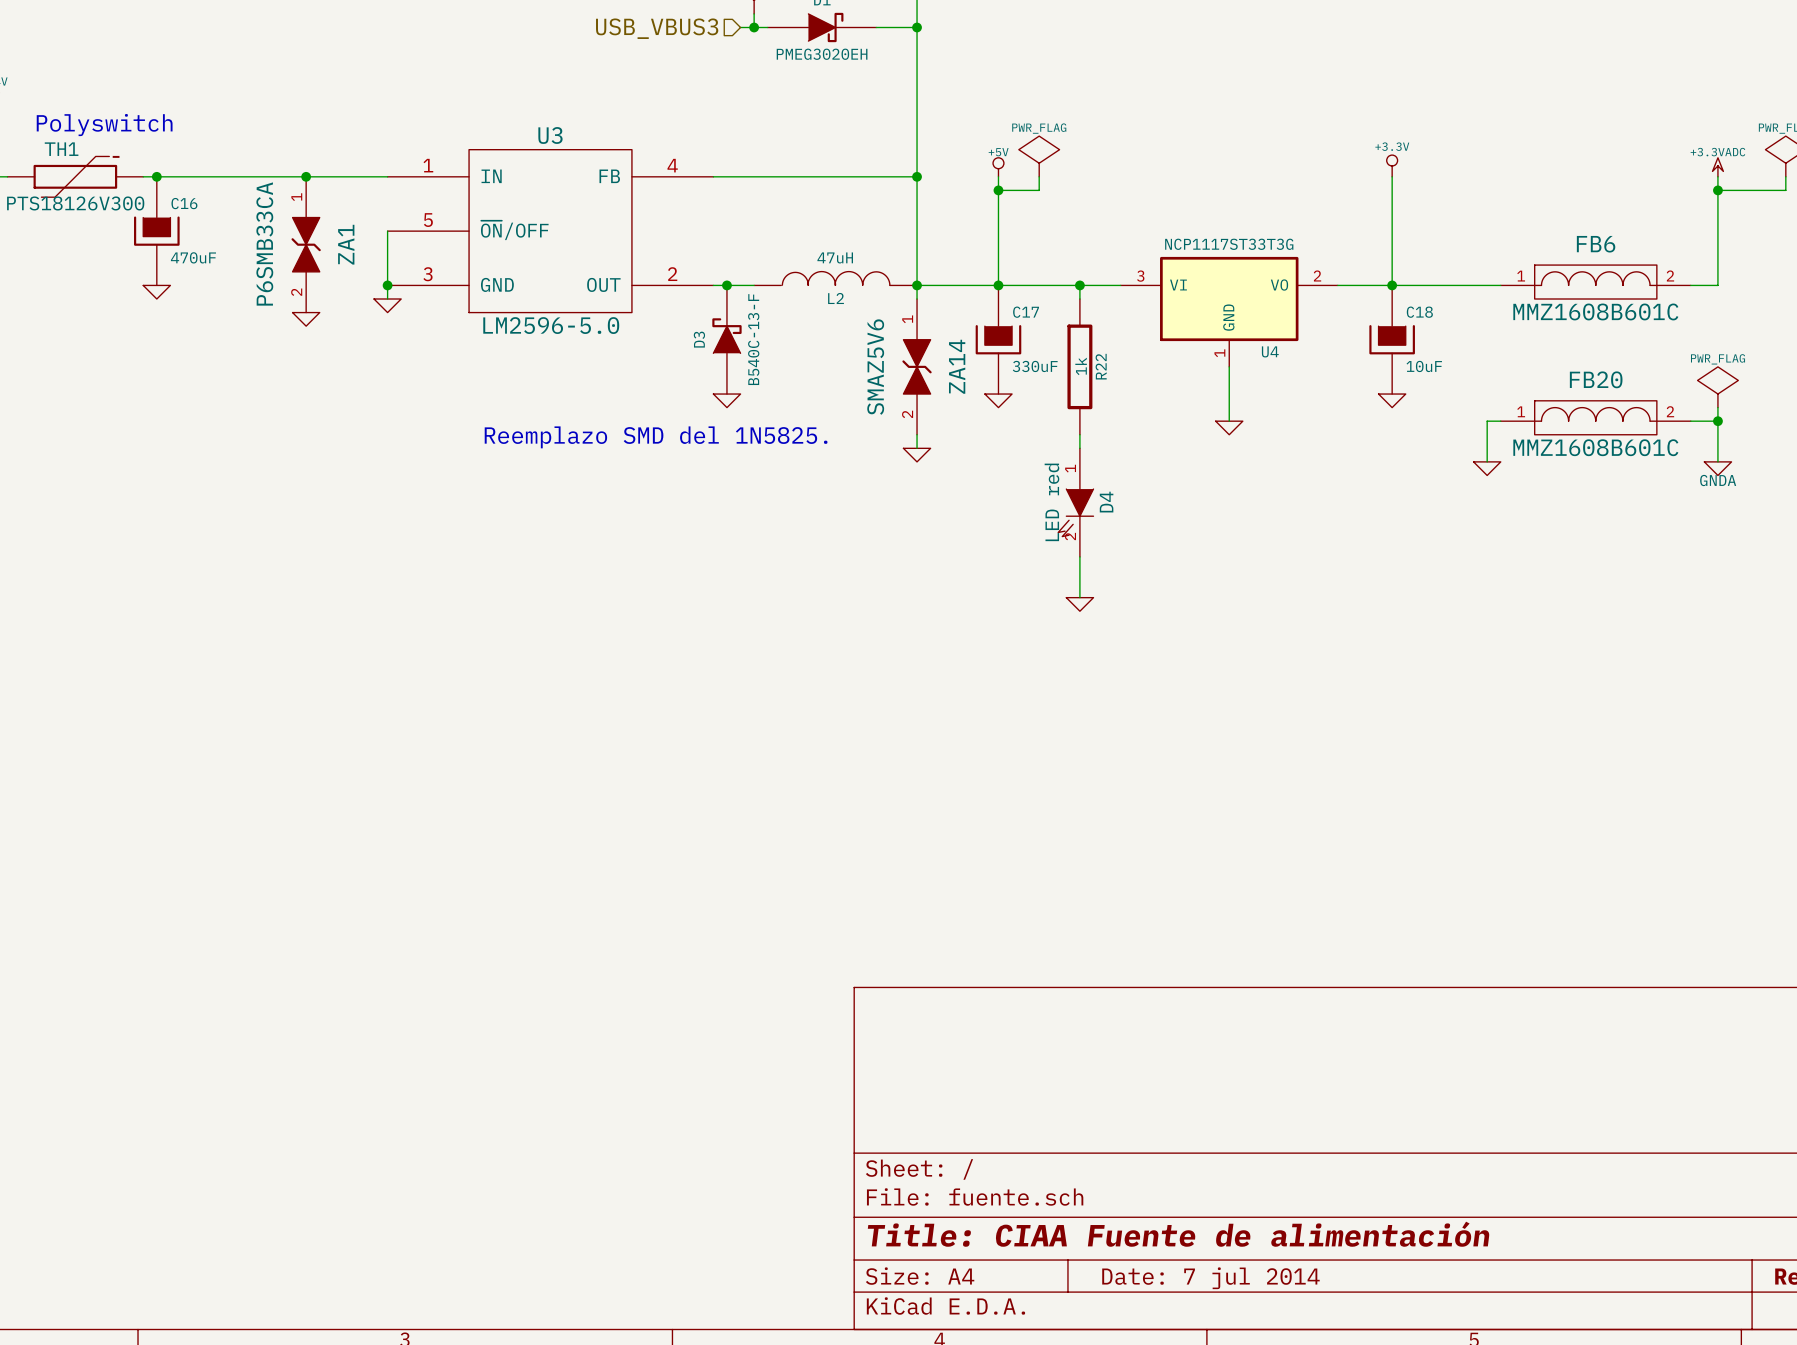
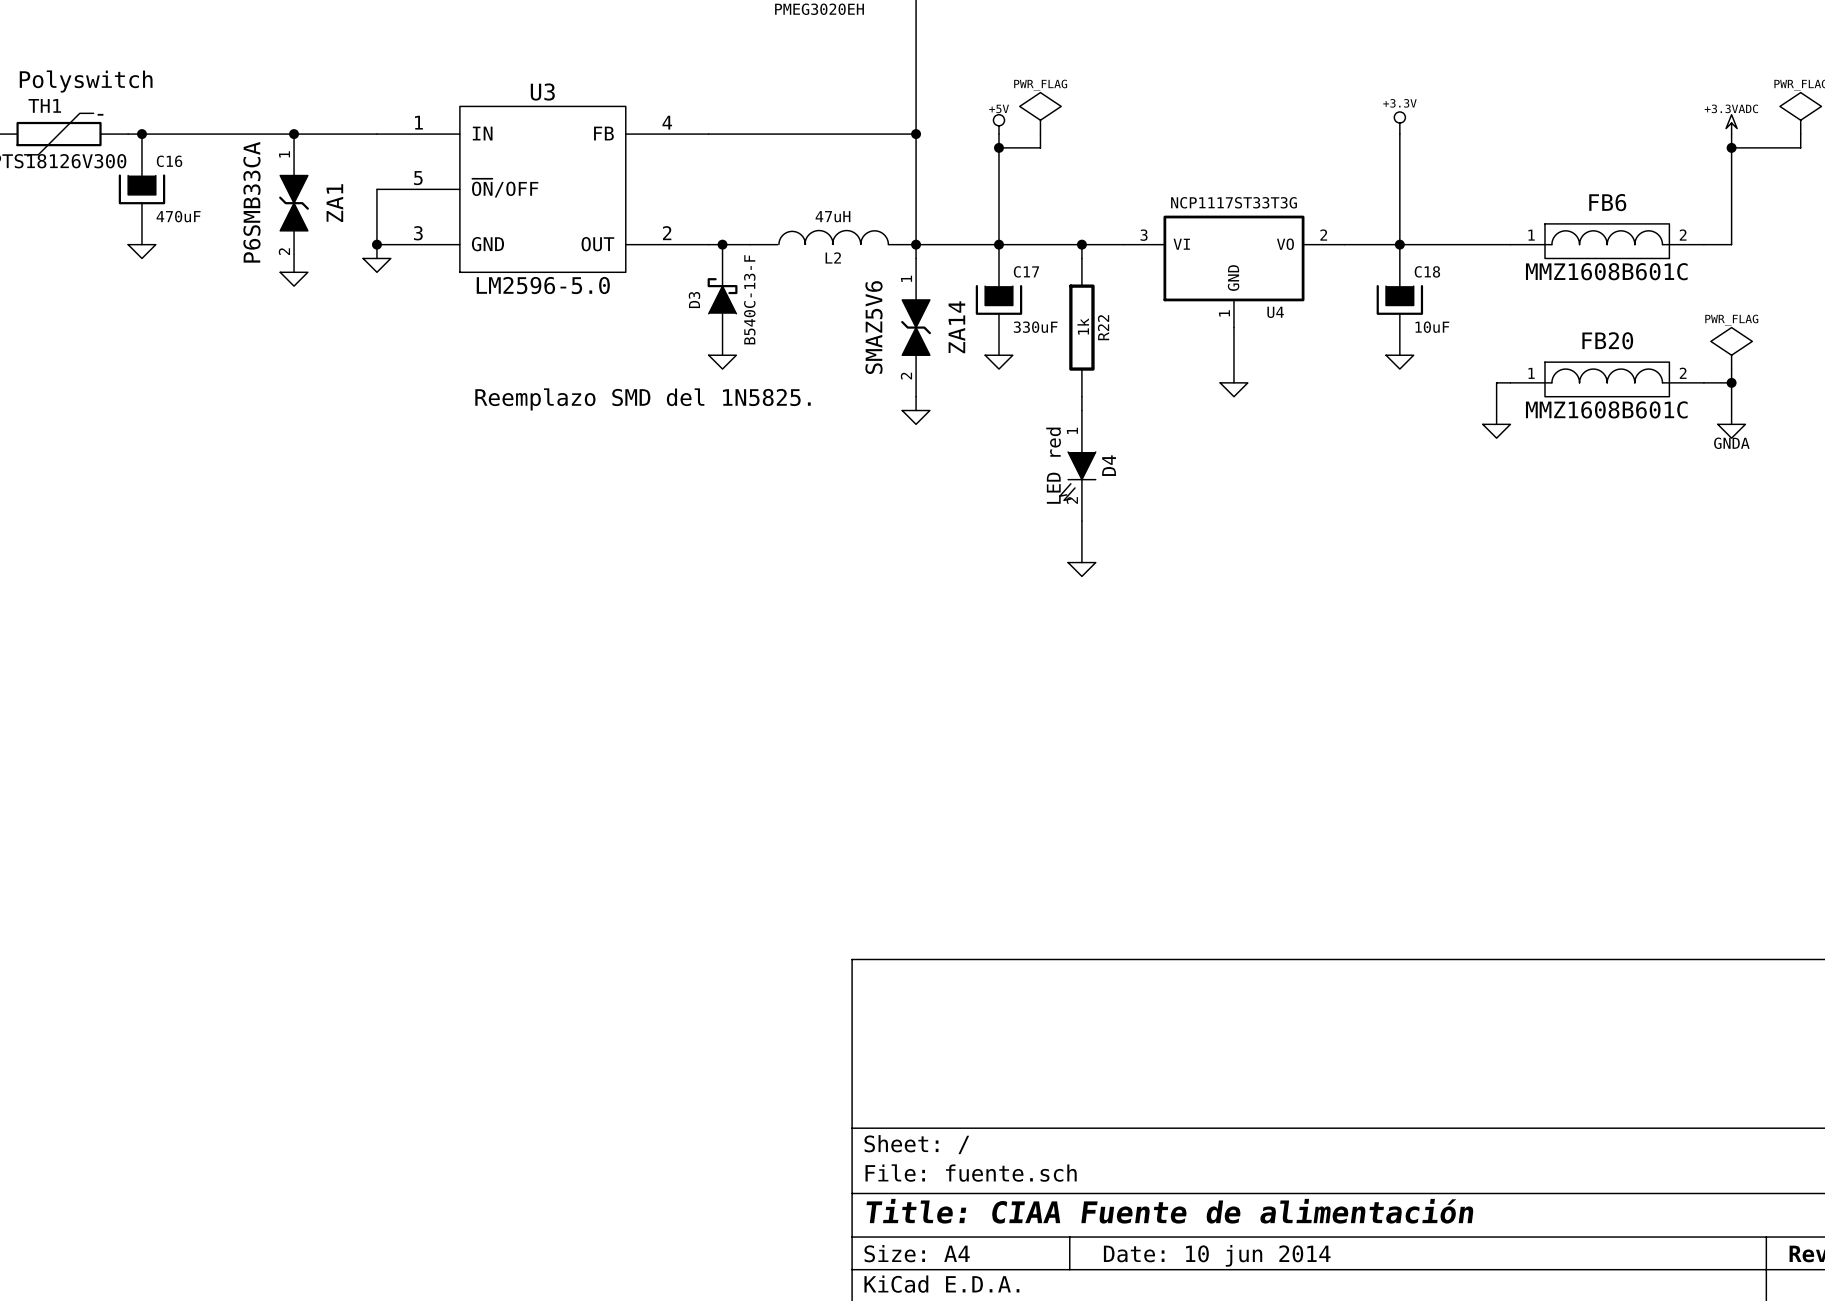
title block: Date: 7 jul 2014 (1210, 1278) -> Date: 10 jun 2014 (1217, 1255)

